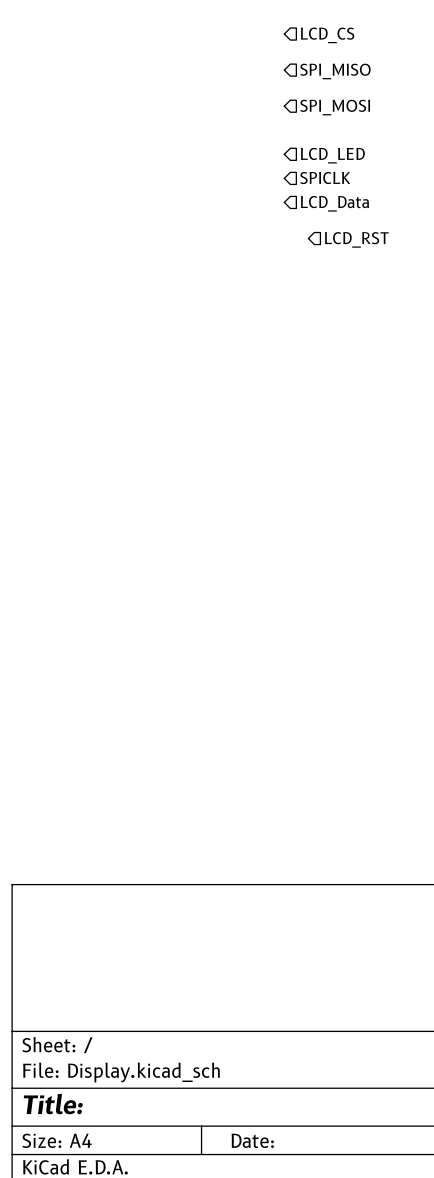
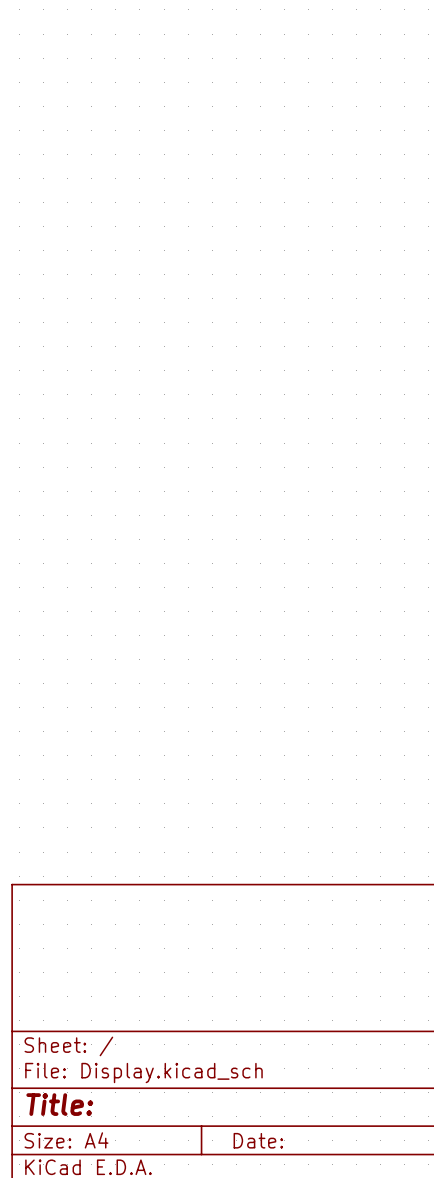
hierarchical label: LCD_CS (327, 35) -> none
hierarchical label: SPI_MISO (335, 71) -> none
hierarchical label: SPI_MOSI (335, 107) -> none
hierarchical label: LCD_LED (332, 155) -> none
hierarchical label: SPICLK (325, 178) -> none
hierarchical label: LCD_Data (334, 203) -> none
hierarchical label: LCD_RST (356, 239) -> none

